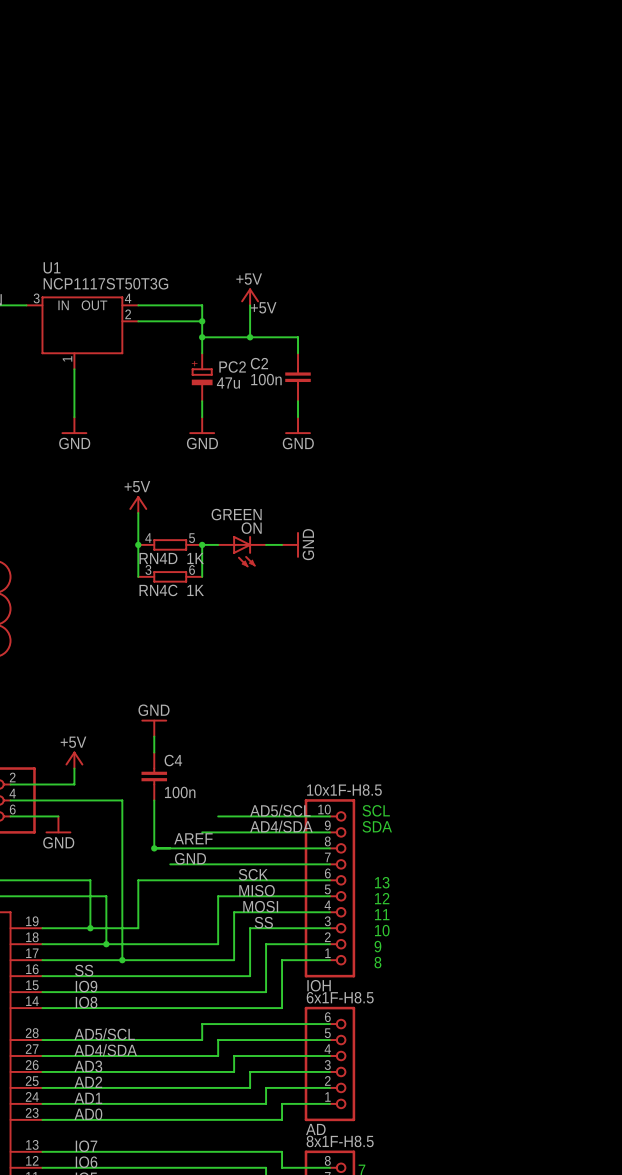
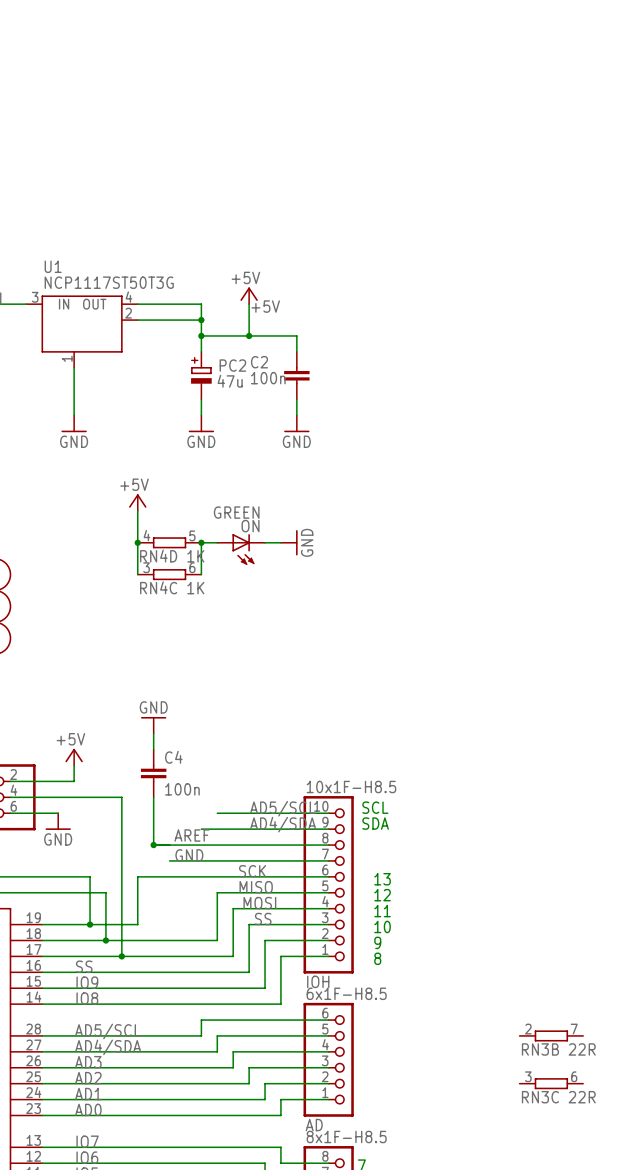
RN3B: none -> 22R (551, 1035)
RN3C: none -> 22R (551, 1083)

